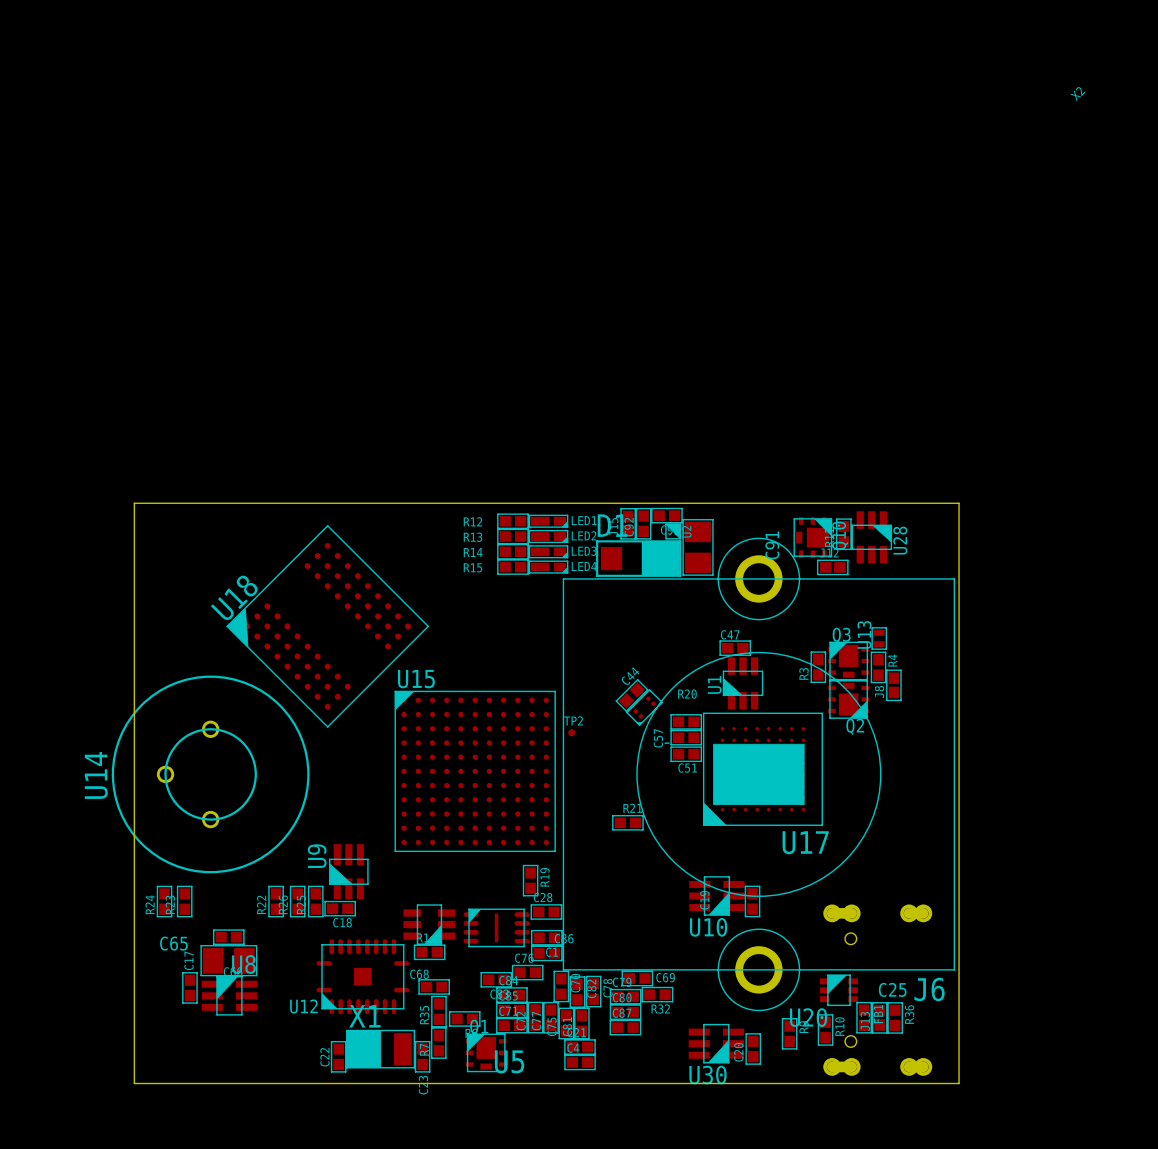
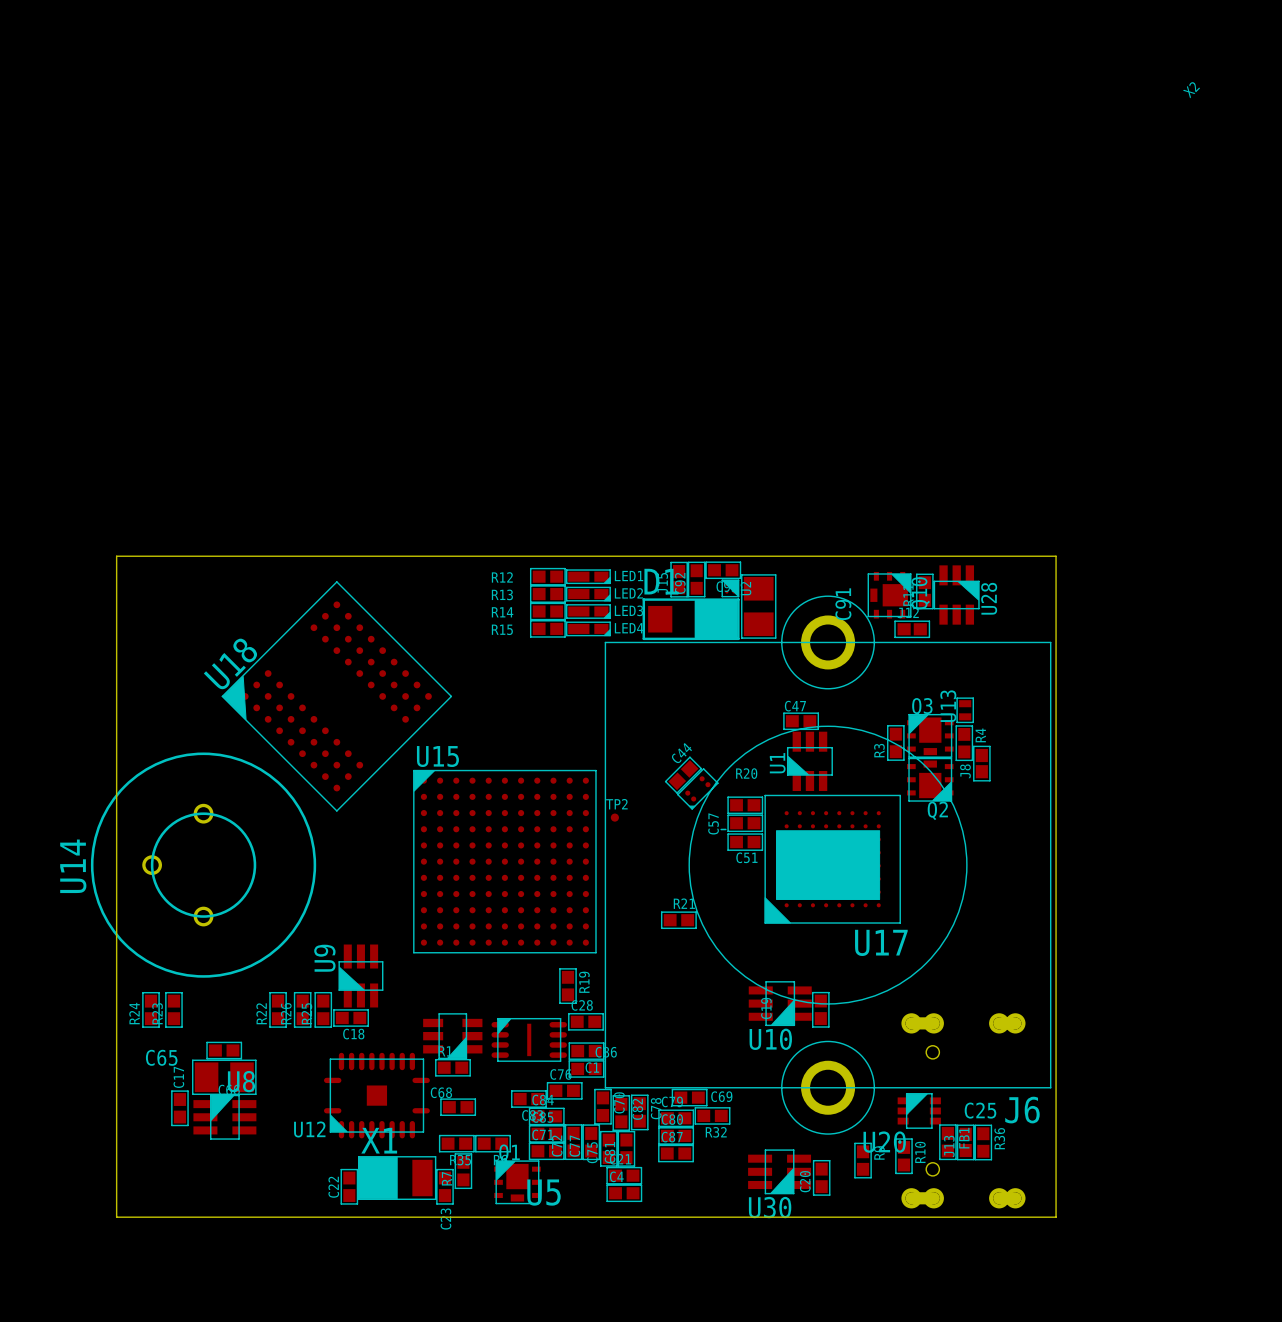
R35 rotation: 0° (438, 1011) -> 90° clockwise (456, 1143)

